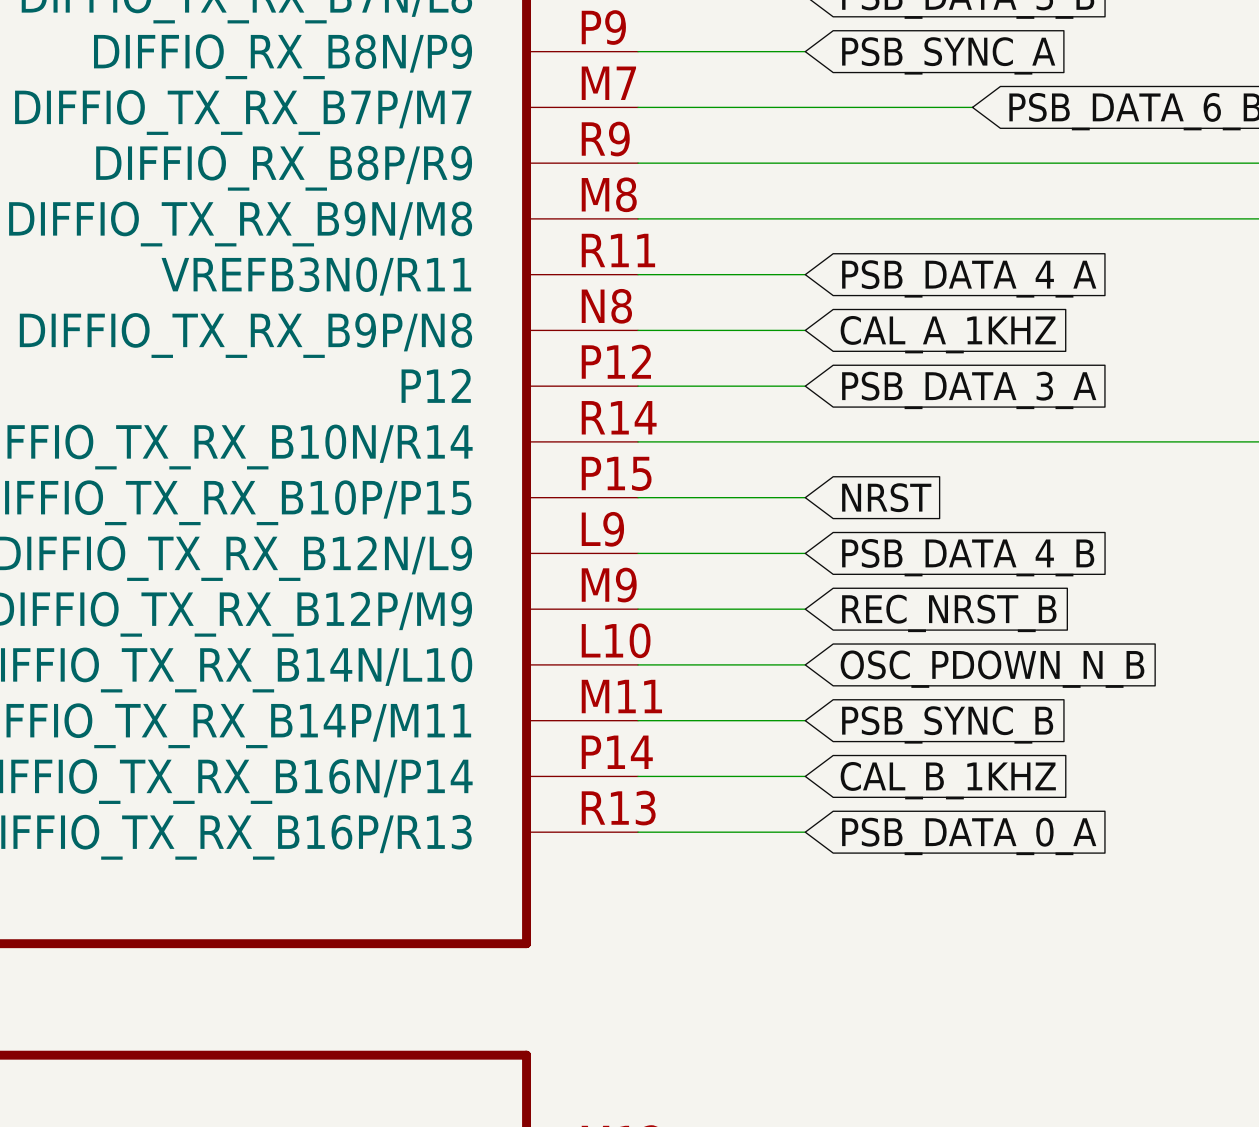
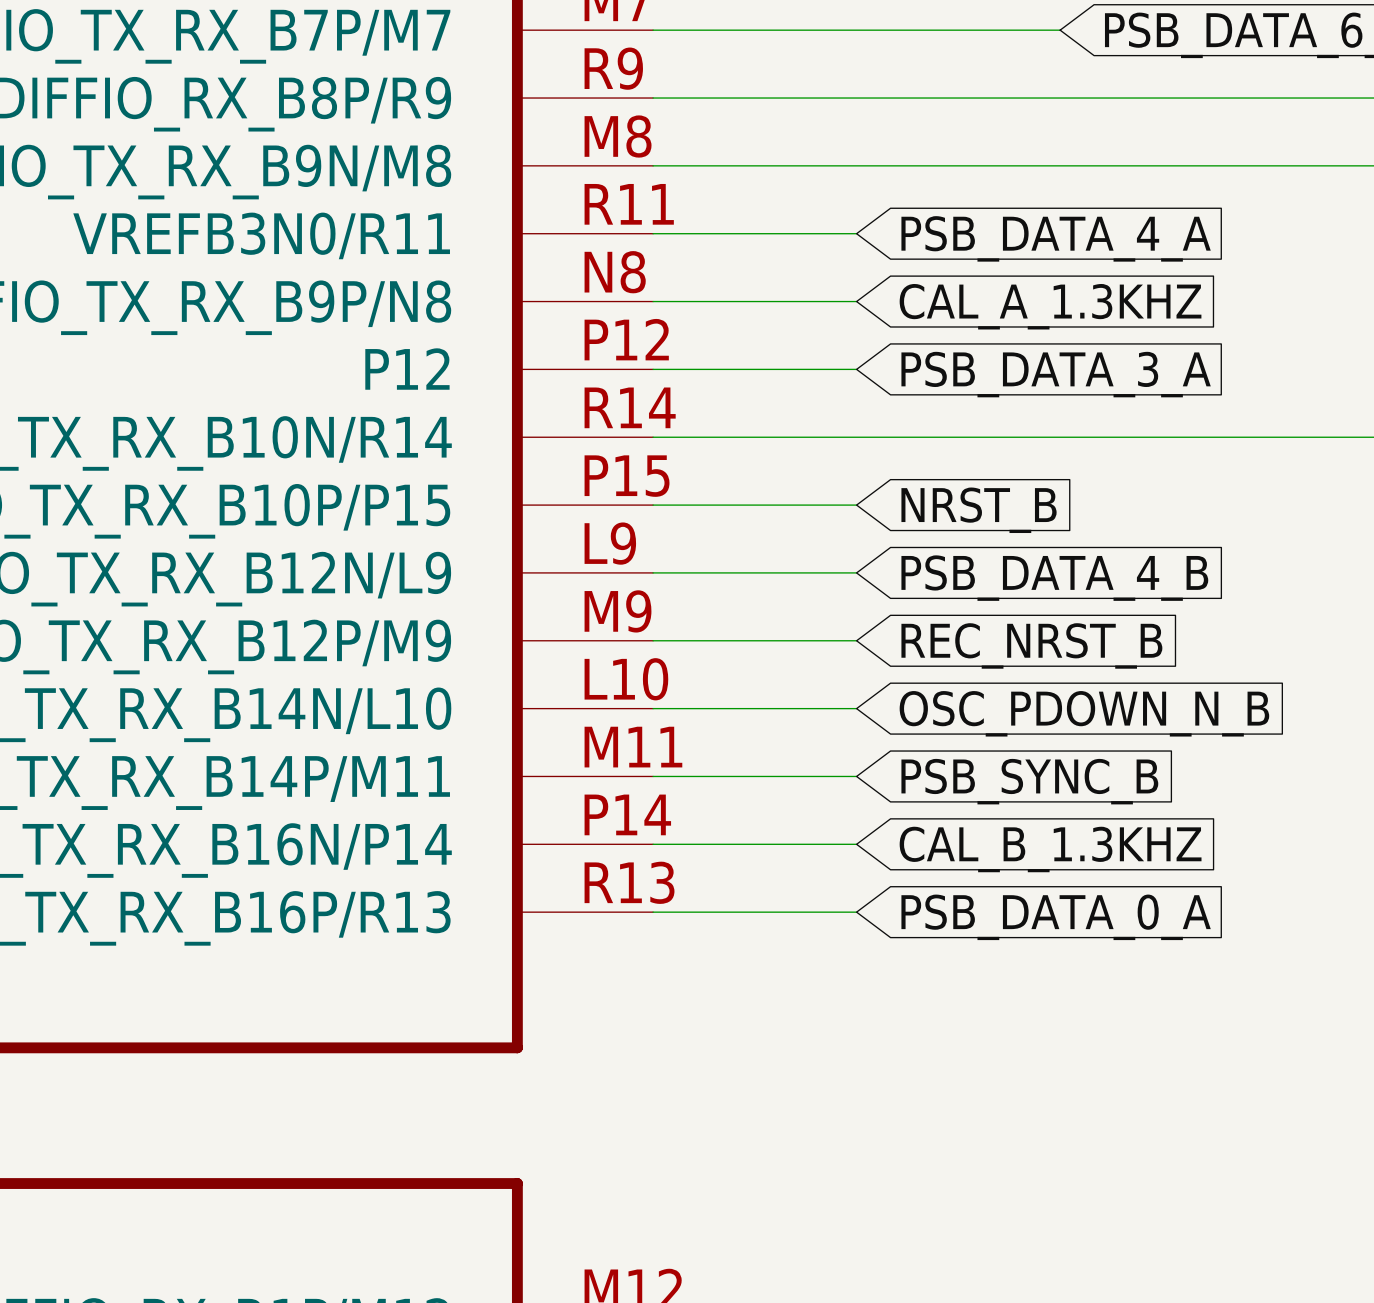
global label: CAL_A_1KHZ (948, 334) -> CAL_A_1.3KHZ (1050, 306)
global label: NRST (886, 497) -> NRST_B (979, 510)
global label: CAL_B_1KHZ (948, 780) -> CAL_B_1.3KHZ (1050, 849)

